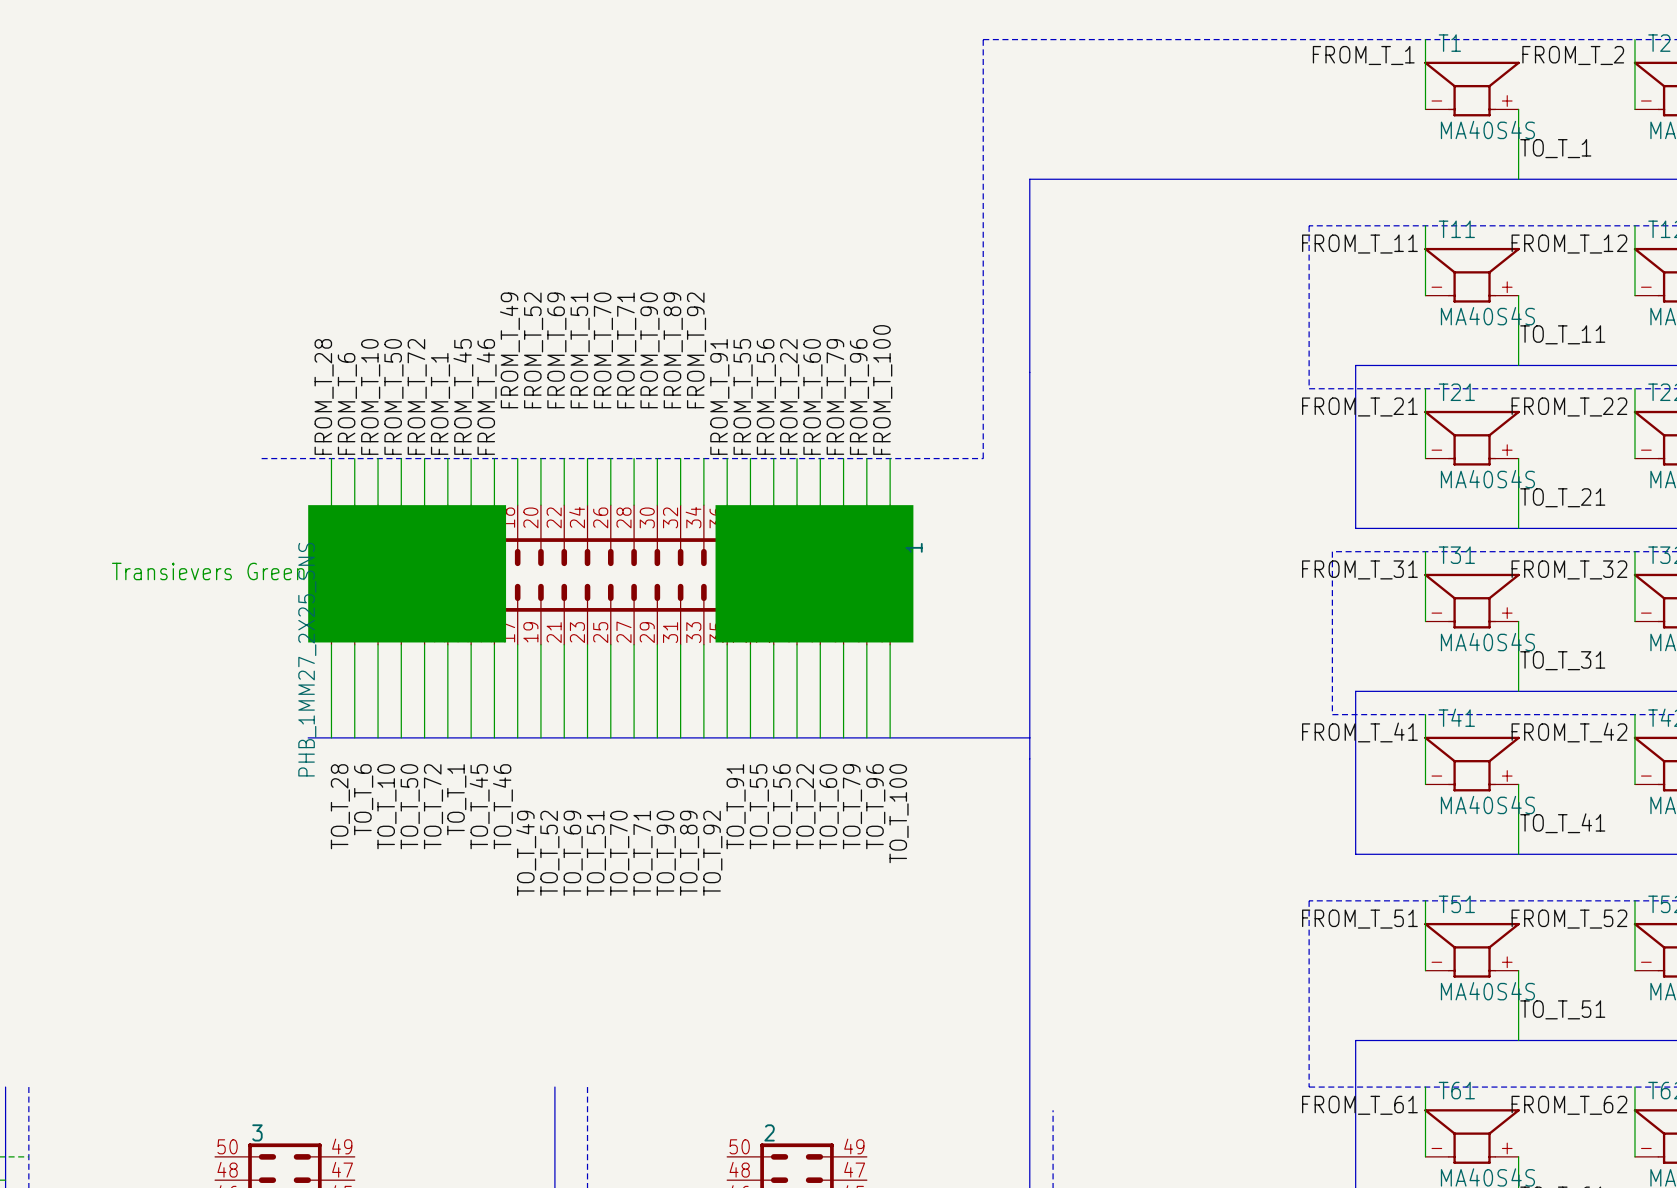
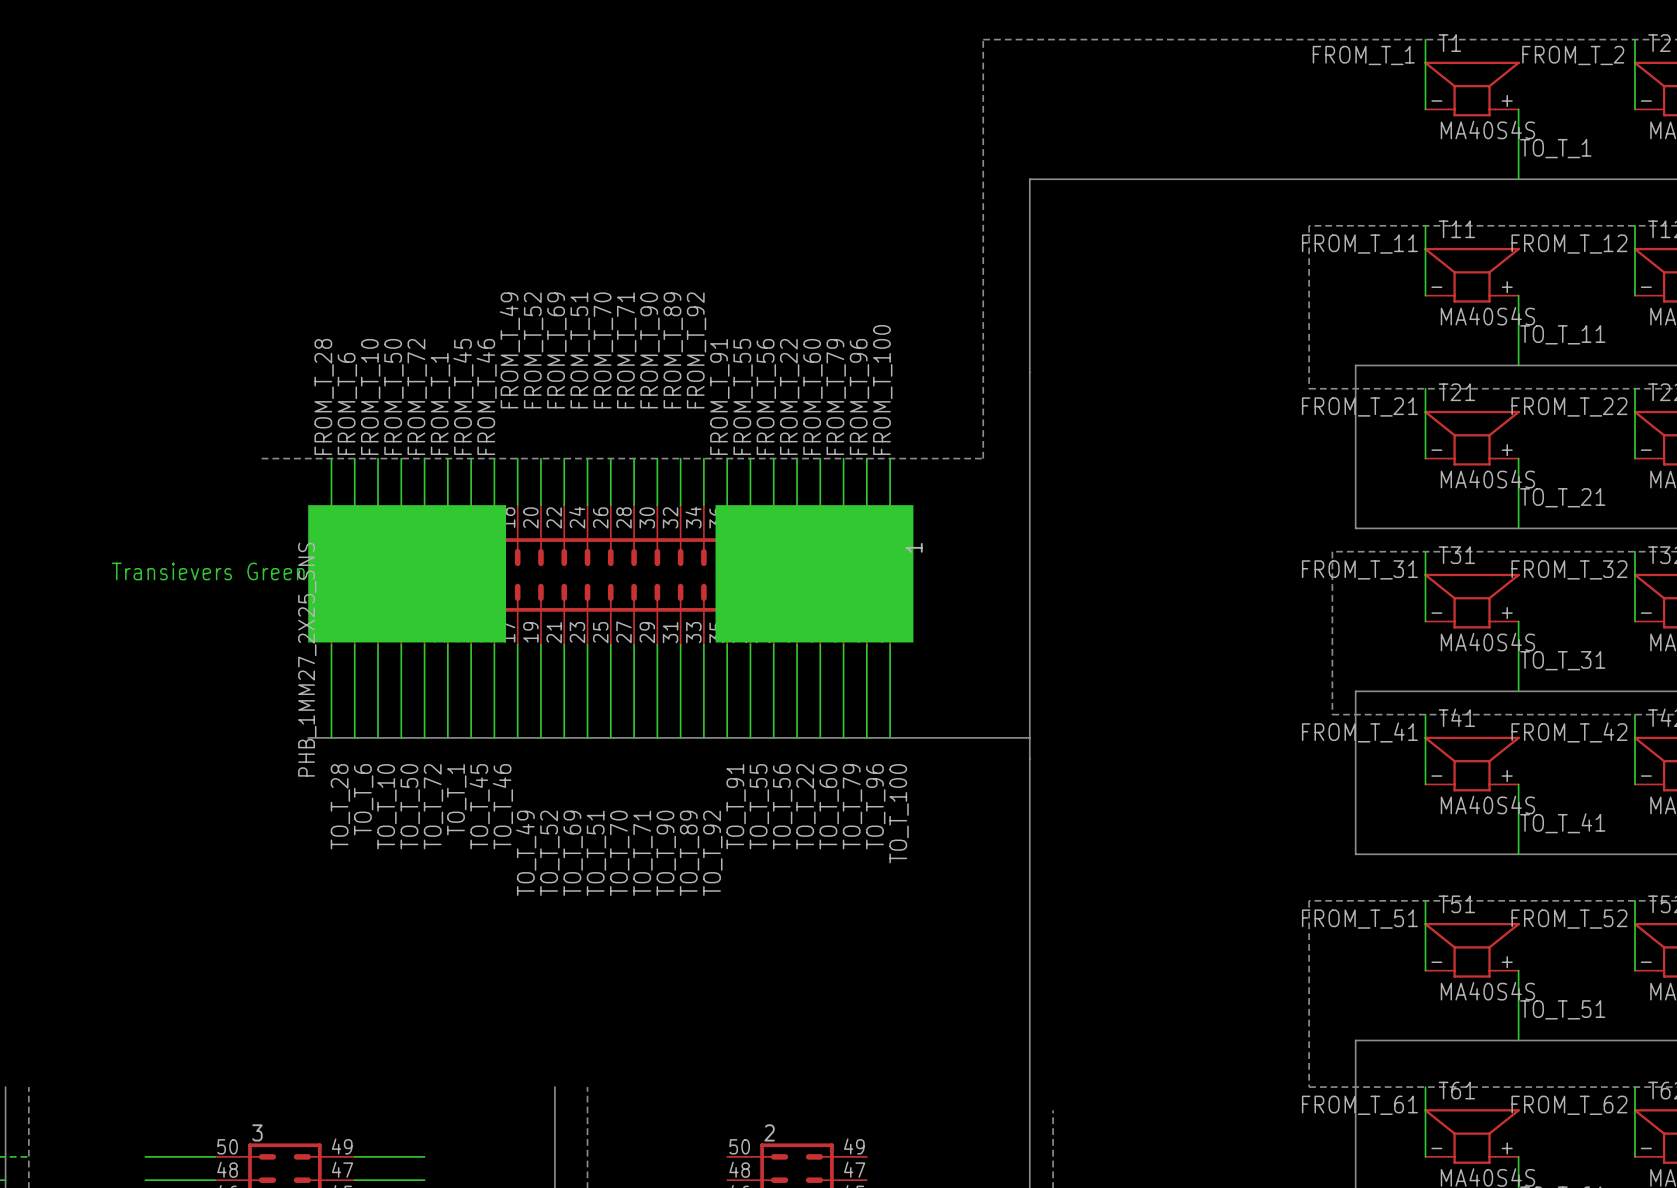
wire: none -> (145, 1156) (215, 1156)
wire: none -> (354, 1156) (424, 1156)
wire: none -> (145, 1180) (215, 1180)
wire: none -> (354, 1180) (424, 1180)

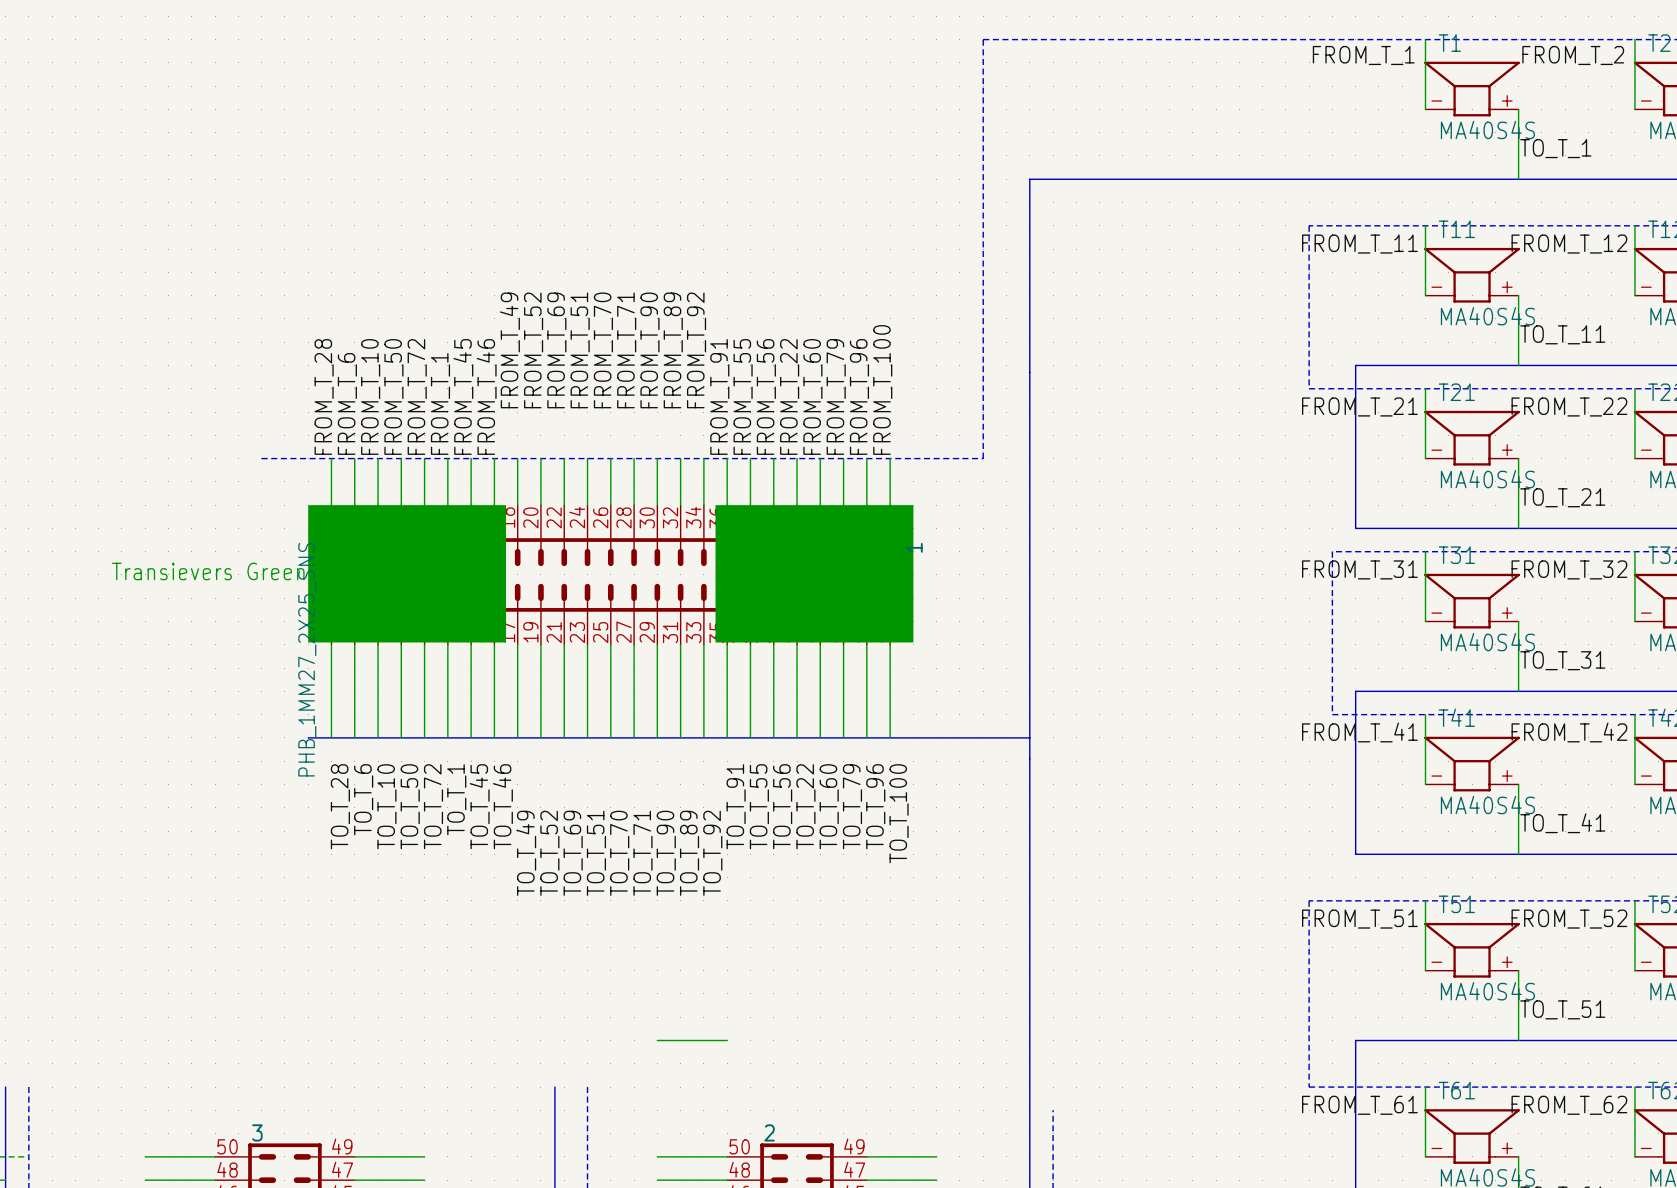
wire: none -> (657, 1040) (727, 1040)
wire: none -> (657, 1156) (727, 1156)
wire: none -> (866, 1156) (936, 1156)
wire: none -> (657, 1180) (727, 1180)
wire: none -> (866, 1180) (936, 1180)

